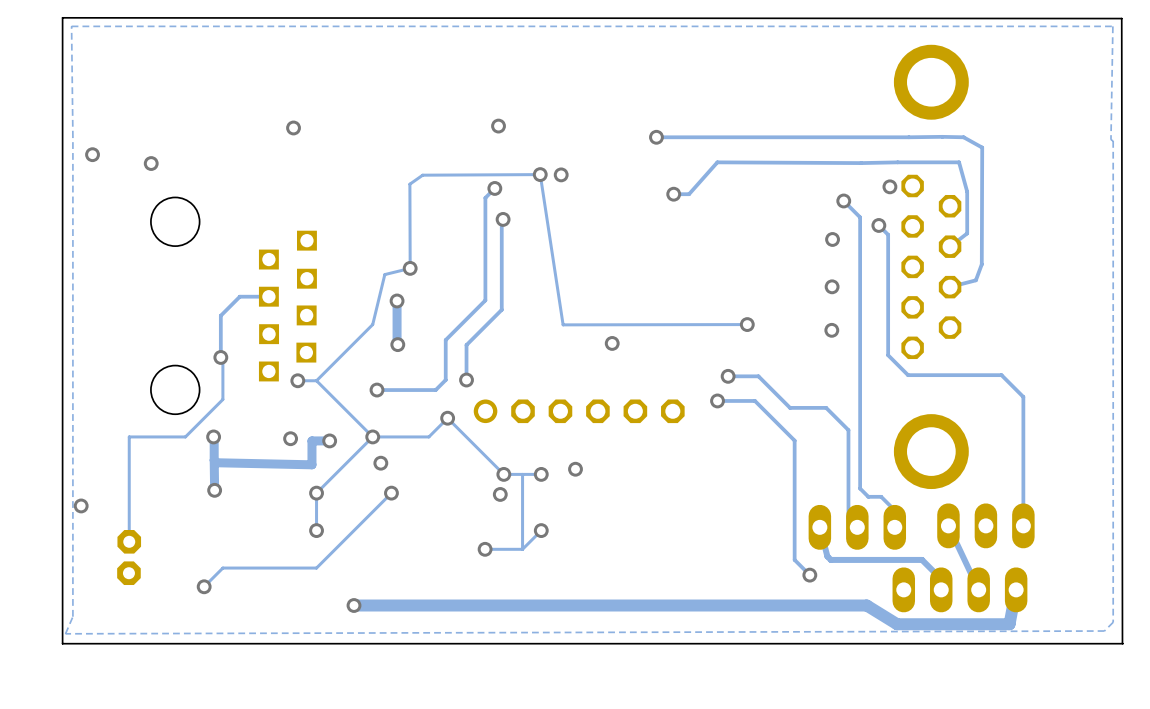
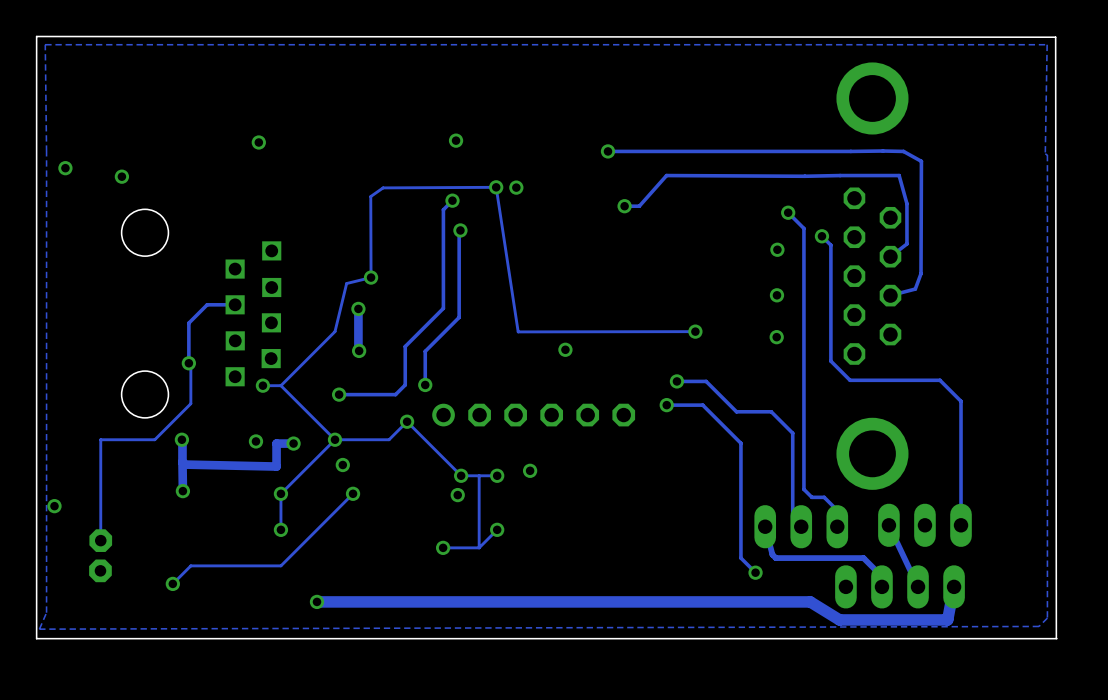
via: (889, 186) -> none

